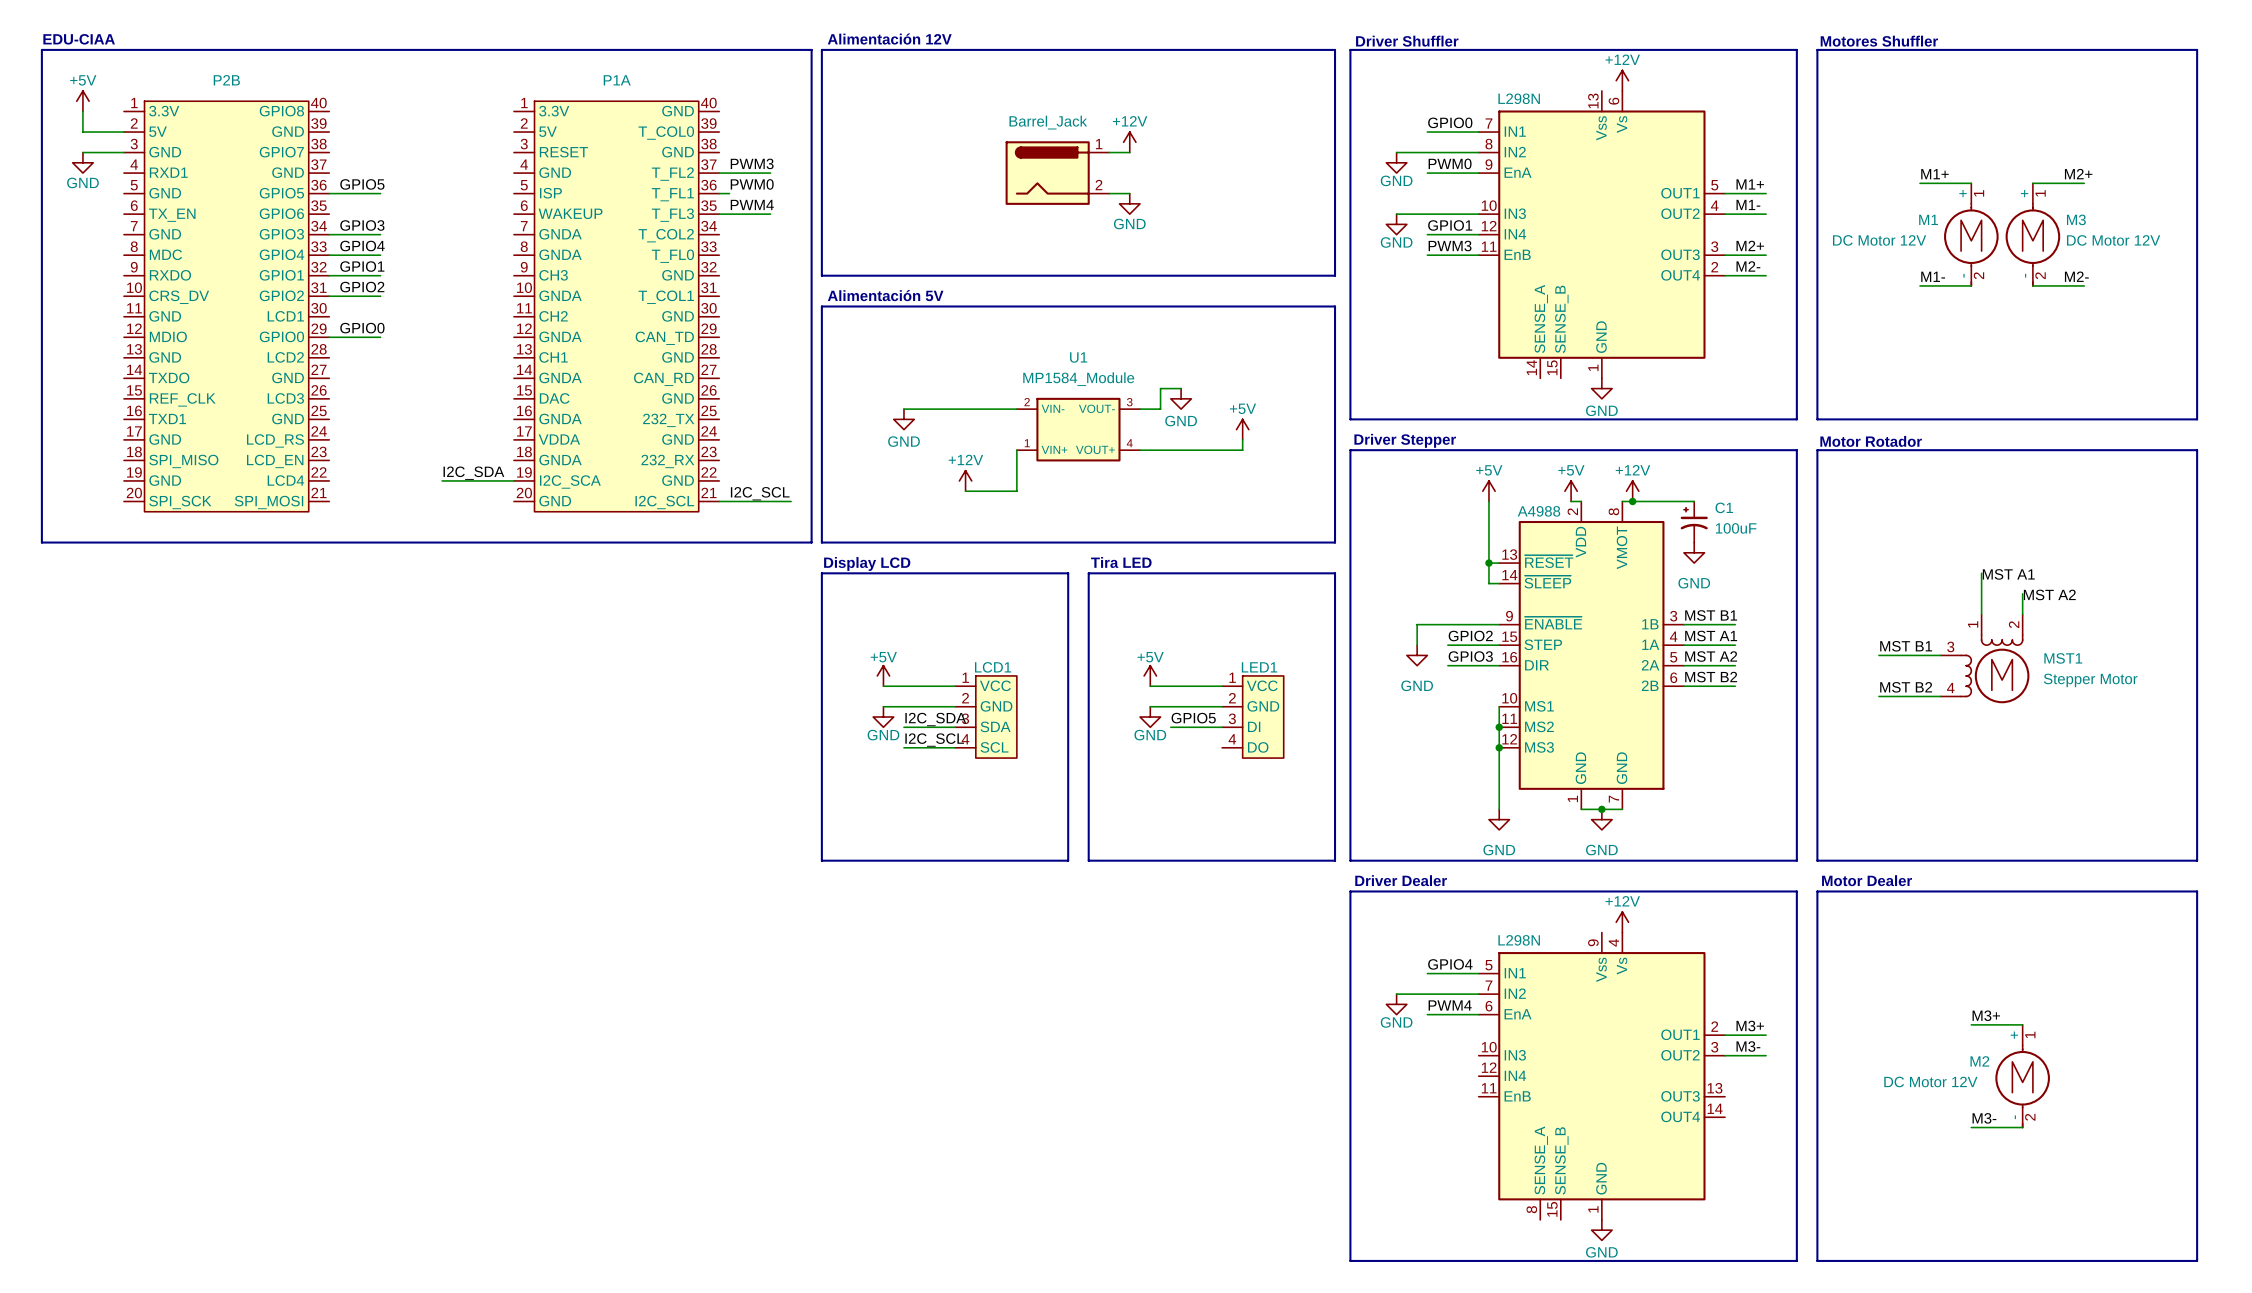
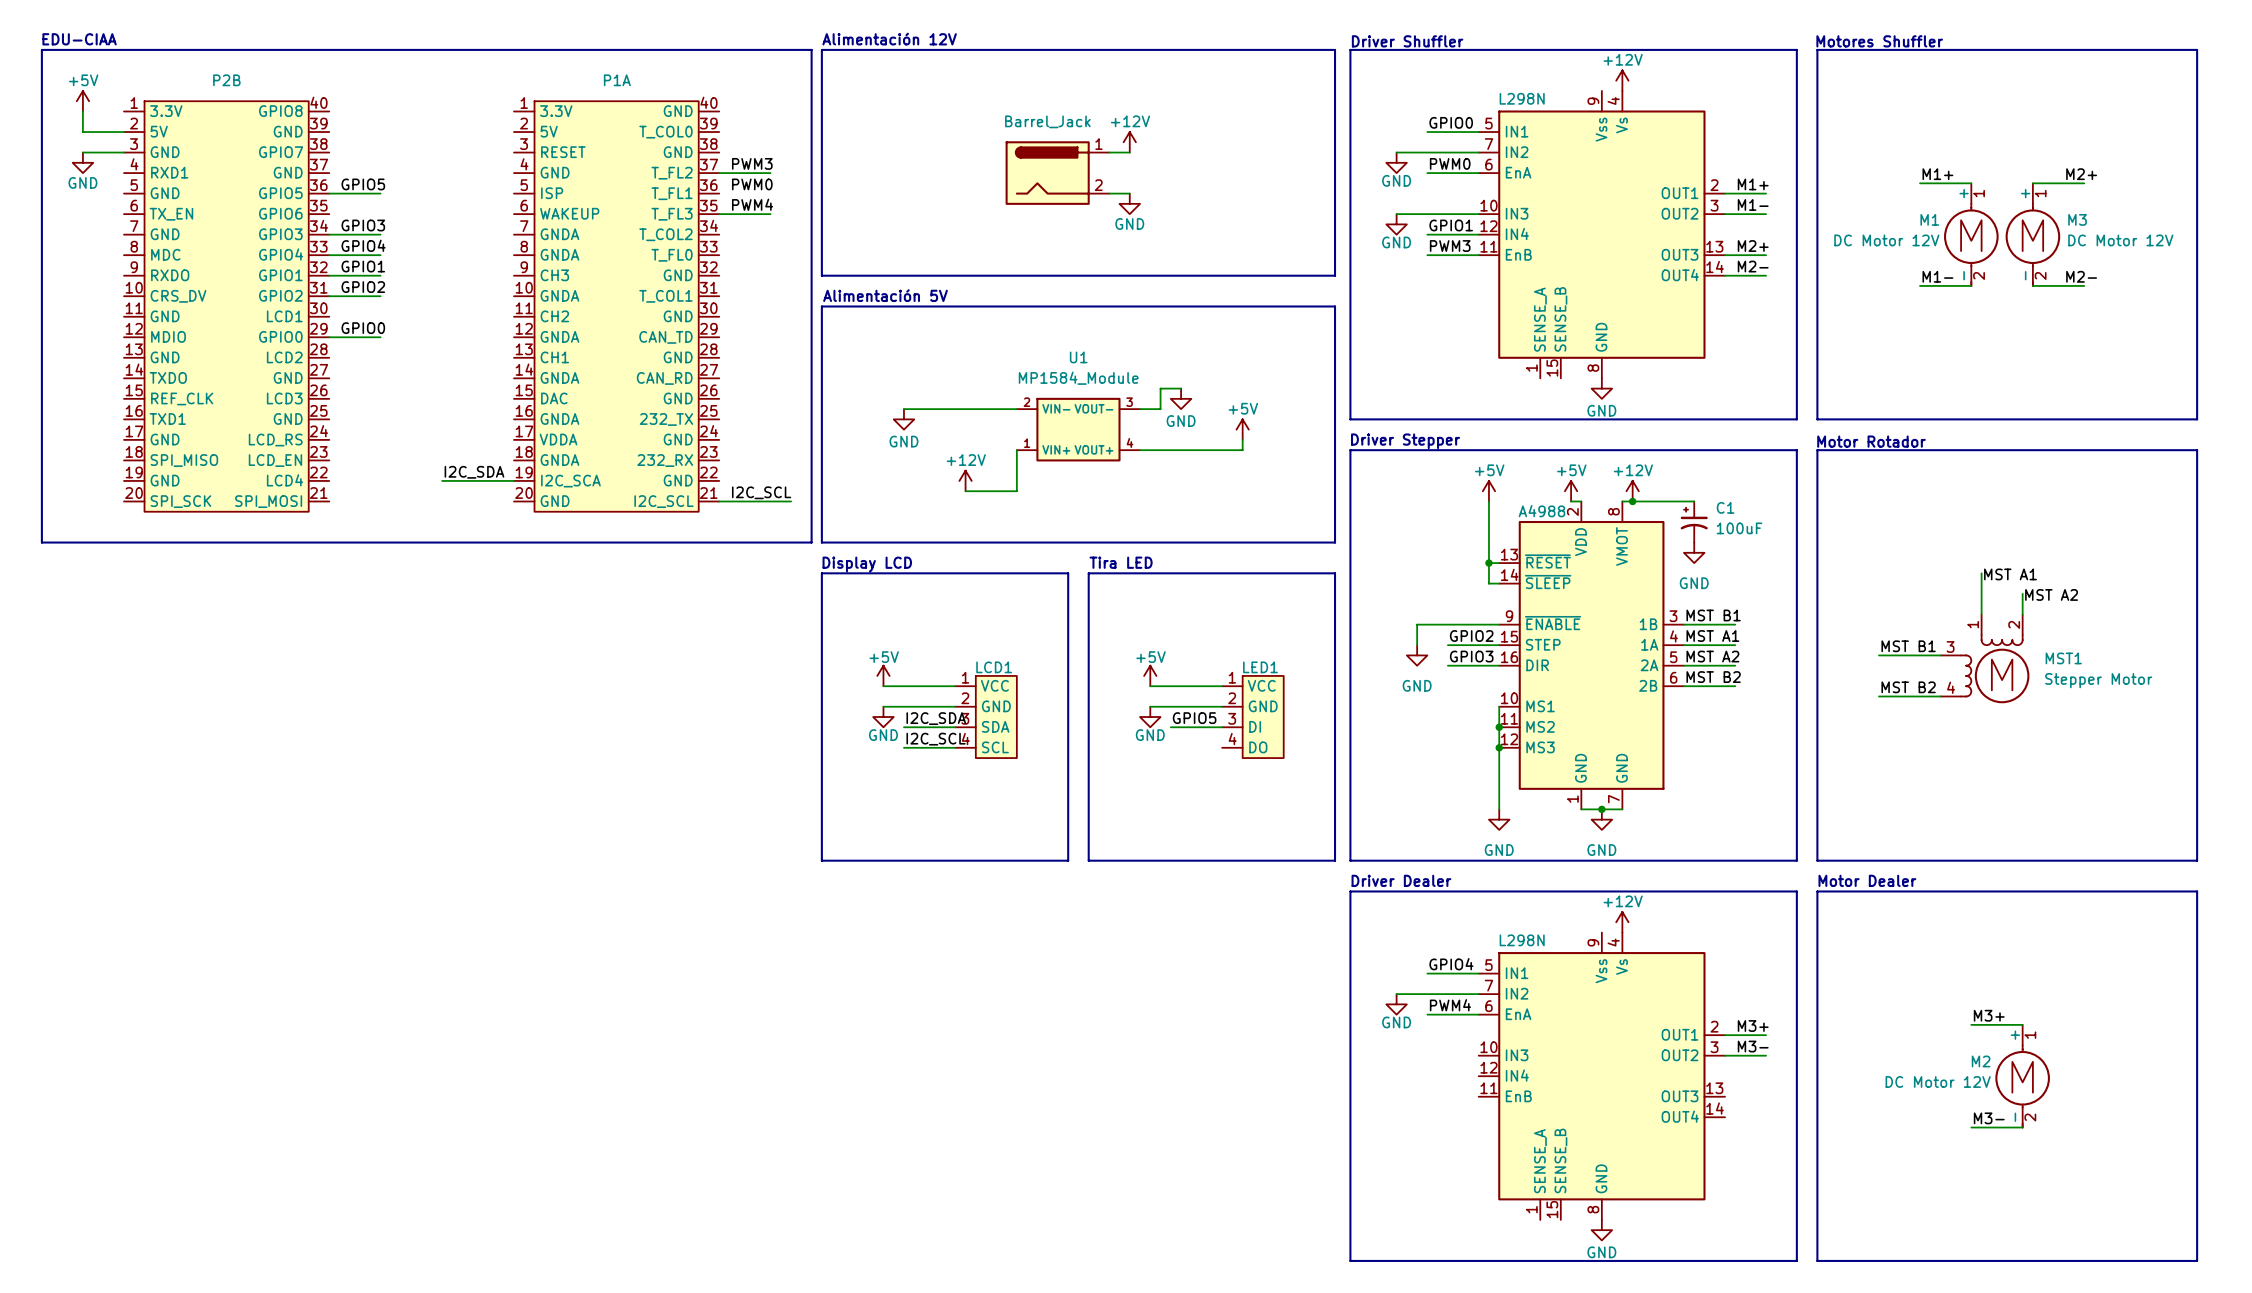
part symbol: [1478, 90, 1726, 379] -> [1478, 90, 1726, 379]
wire: (719, 193) (729, 193) -> none
part pin number: 8 (1531, 1209) -> 1 (1531, 1209)
part pin number: 1 (1593, 1209) -> 8 (1593, 1209)

